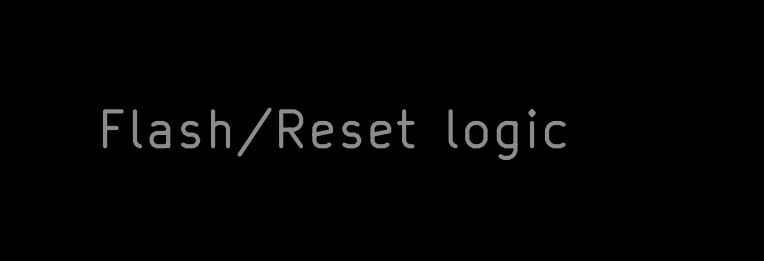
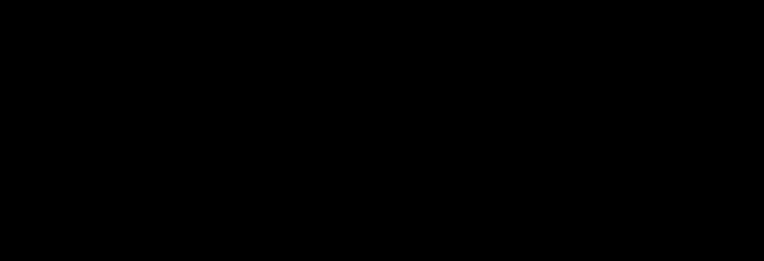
text: Flash/Reset logic (334, 133) -> none

